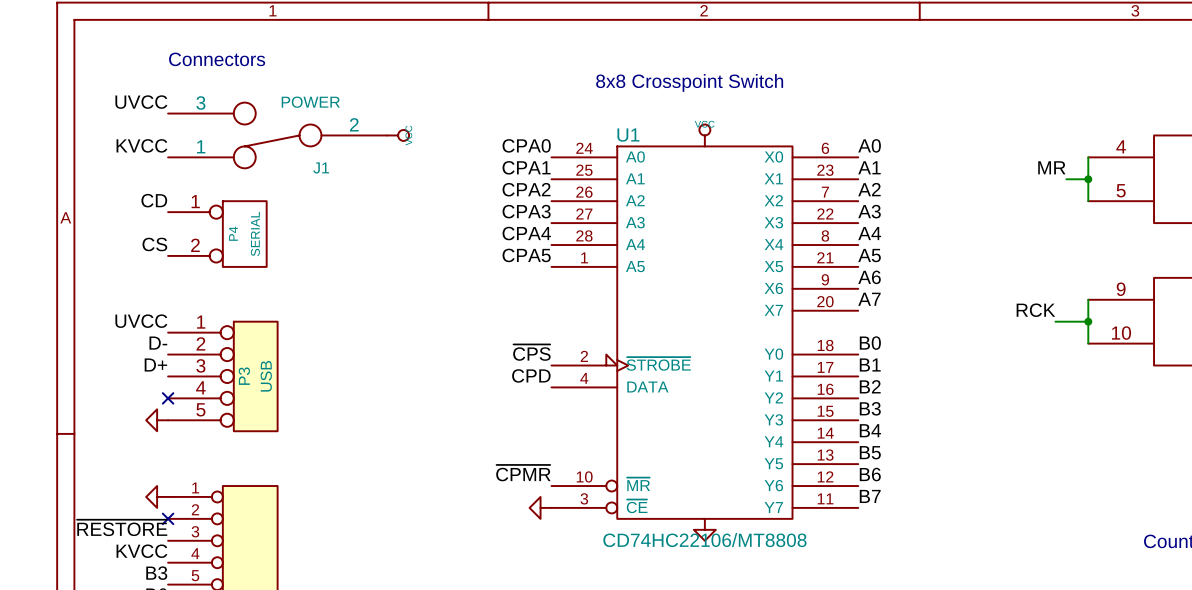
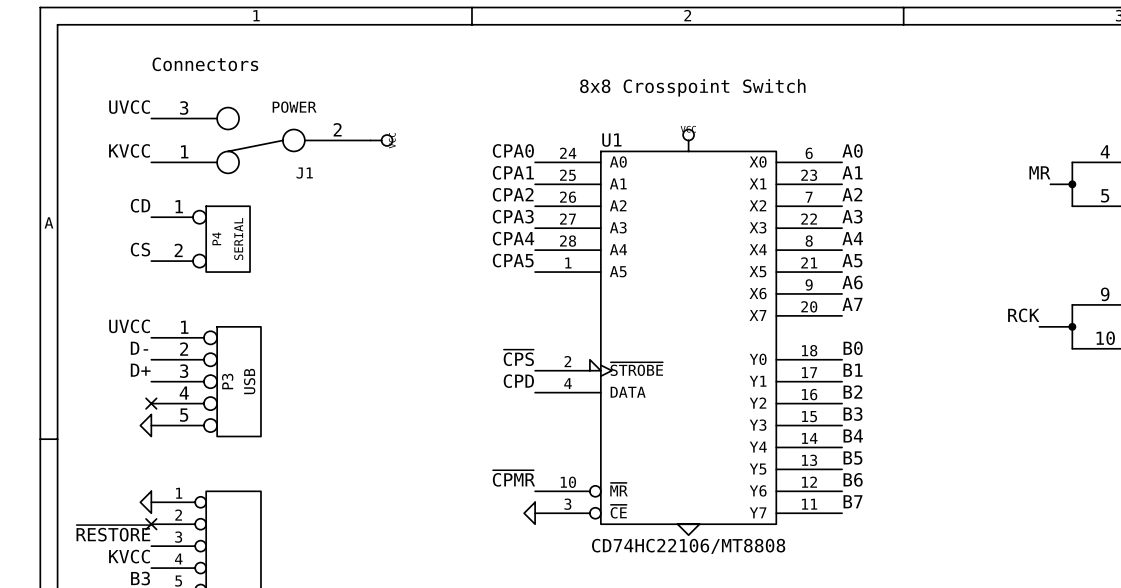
power symbol shape: [146, 409, 169, 432] -> [140, 414, 152, 437]
power symbol shape: [146, 486, 169, 508] -> [140, 491, 152, 514]
power symbol shape: [529, 496, 552, 519] -> [524, 502, 536, 525]
power symbol shape: [693, 518, 716, 541] -> [677, 524, 700, 536]

